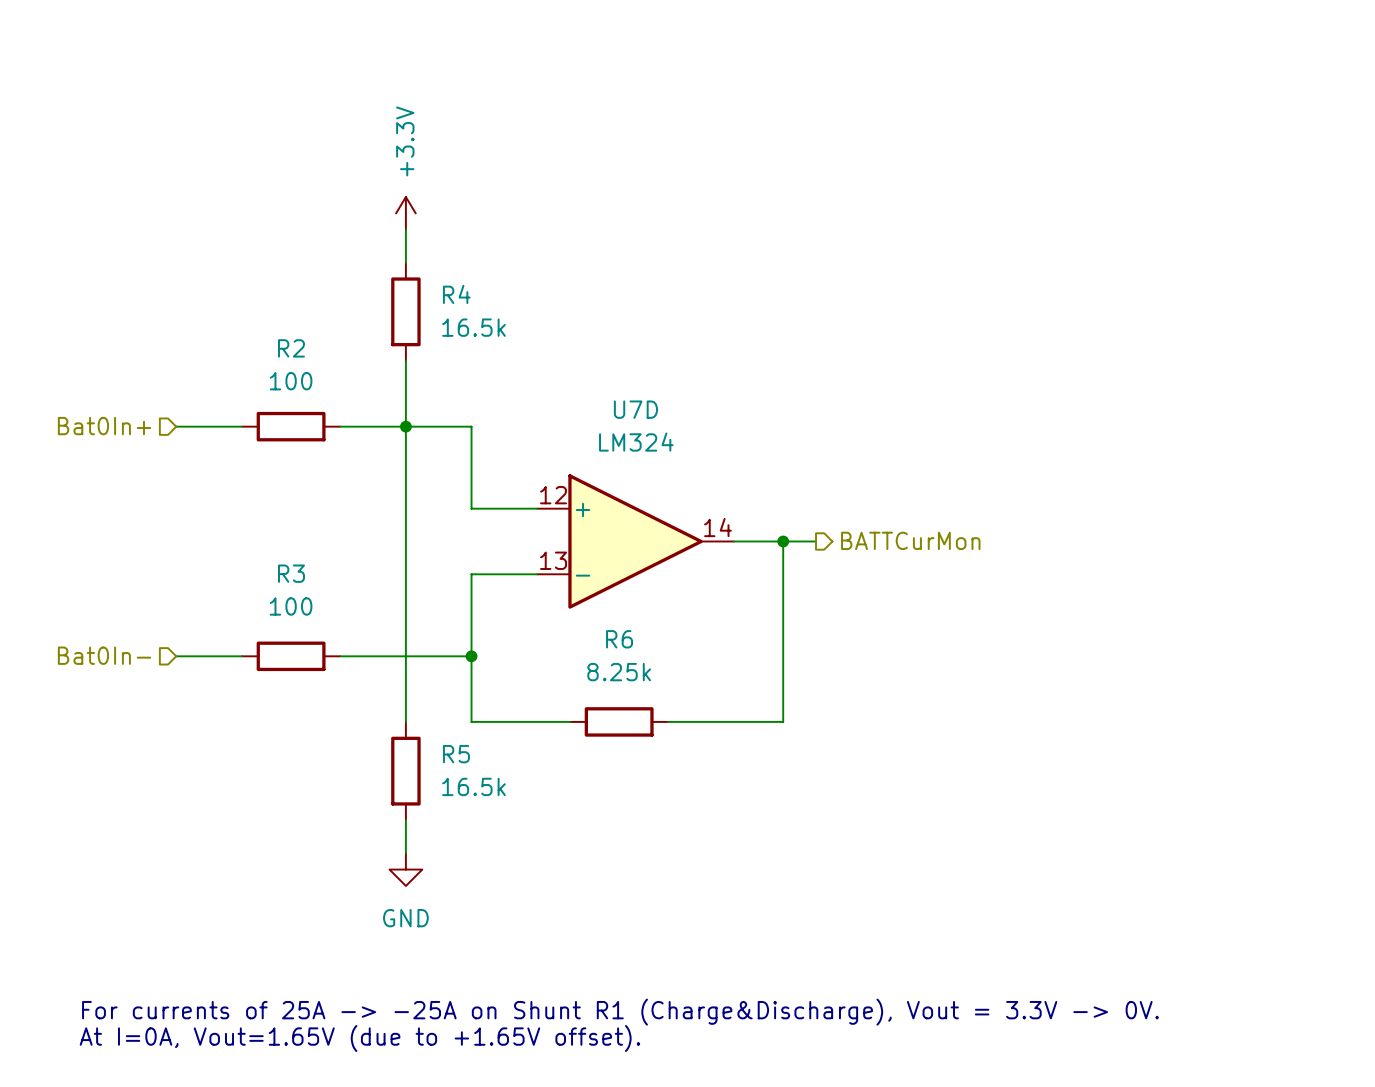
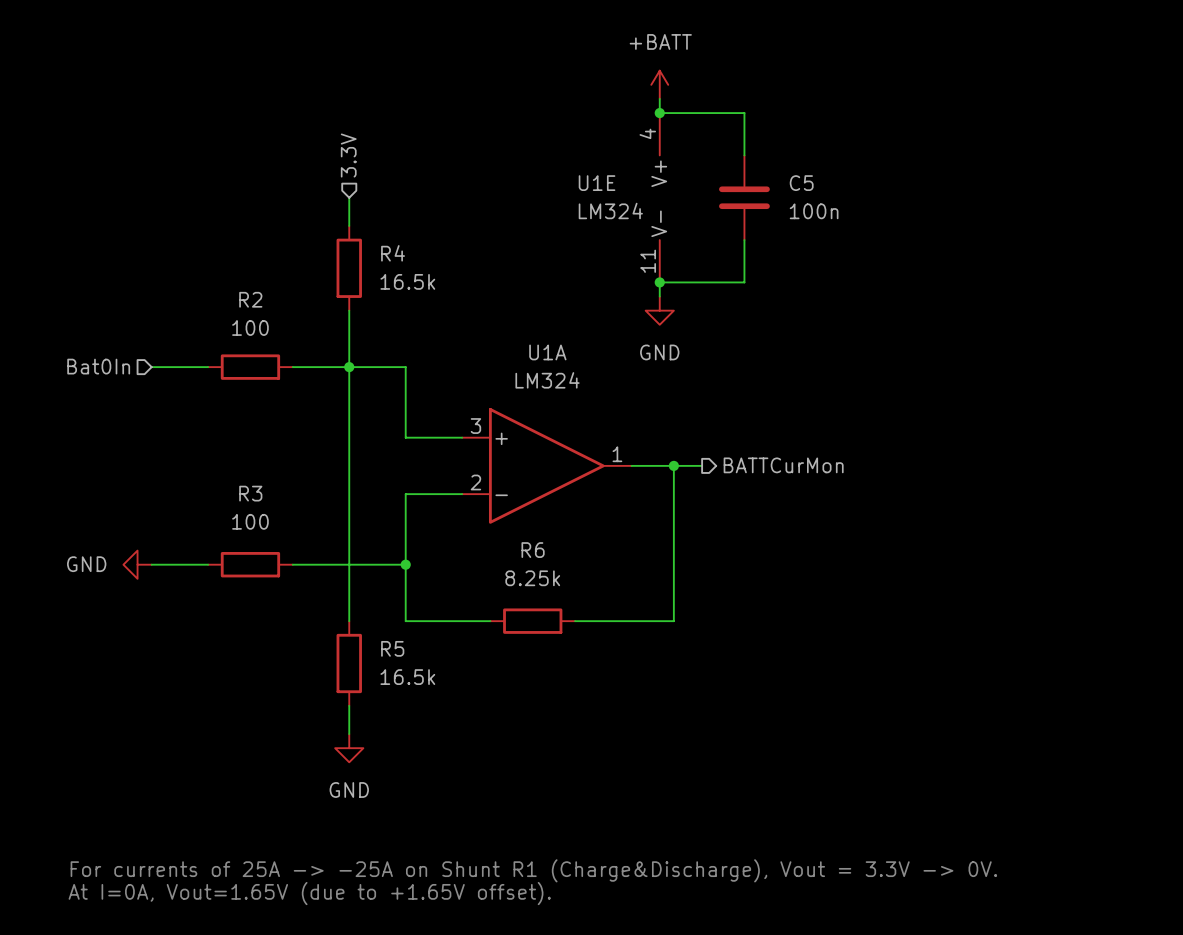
power symbol: none -> +BATT (659, 84)
wire: none -> (659, 98) (659, 113) (744, 113) (744, 155)
junction: none -> (659, 113)
hierarchical label: none -> 3.3V (348, 155)
power symbol: +3.3V (405, 213) -> none
U1E: none -> LM324 (659, 197)
C5: none -> 100n (744, 197)
wire: none -> (744, 240) (744, 282) (659, 282) (659, 296)
junction: none -> (659, 282)
power symbol: none -> GND (659, 310)
U7D name: U7D (635, 409) -> U1A (547, 352)
hierarchical label: Bat0In+ (104, 426) -> Bat0In (98, 366)
U7D pin number: 12 (553, 495) -> 3 (475, 426)
U7D pin number: 14 (717, 527) -> 1 (617, 454)
U7D pin number: 13 (553, 560) -> 2 (475, 482)
hierarchical label: Bat0In- (104, 655) -> none
power symbol: none -> GND (137, 564)

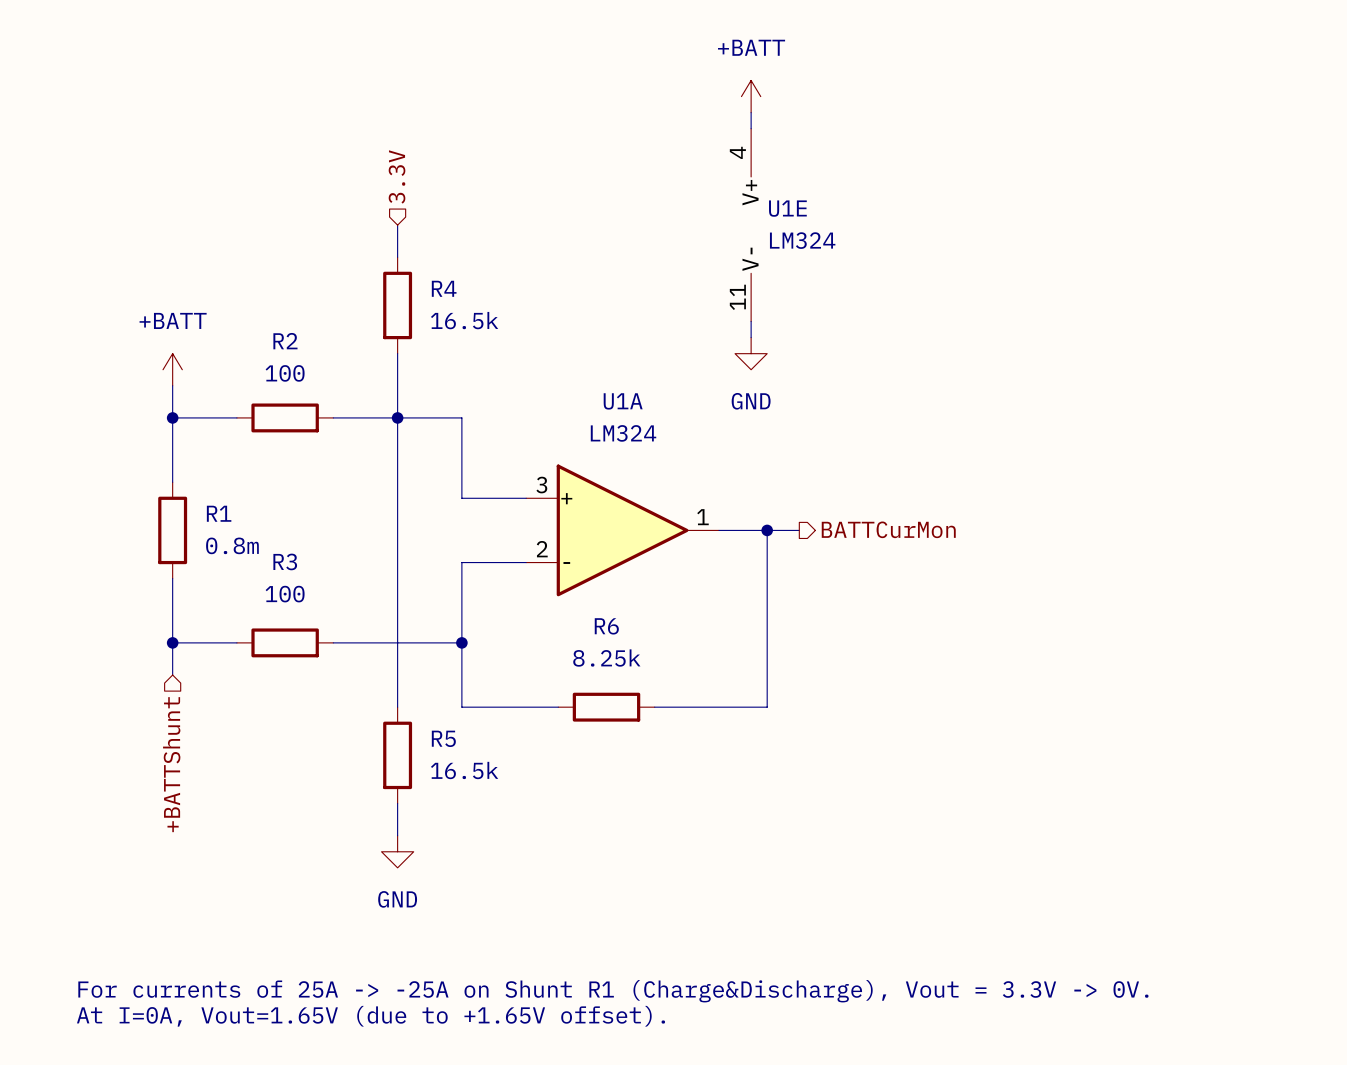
wire: (659, 113) (744, 113) (744, 155) -> none
junction: (659, 113) -> none
U1E name position: U1E (597, 183) -> U1E (787, 208)
C5: 100n (744, 197) -> none
U1E value position: LM324 (610, 210) -> LM324 (802, 240)
wire: (744, 240) (744, 282) (659, 282) -> none
junction: (659, 282) -> none
power symbol: none -> +BATT (172, 369)
wire: none -> (172, 385) (172, 482)
hierarchical label: Bat0In (98, 366) -> none
junction: none -> (172, 417)
R1: none -> 0.8m (172, 530)
wire: none -> (172, 578) (172, 675)
power symbol: GND (137, 564) -> none
junction: none -> (172, 642)
hierarchical label: none -> +BATTShunt (171, 764)

